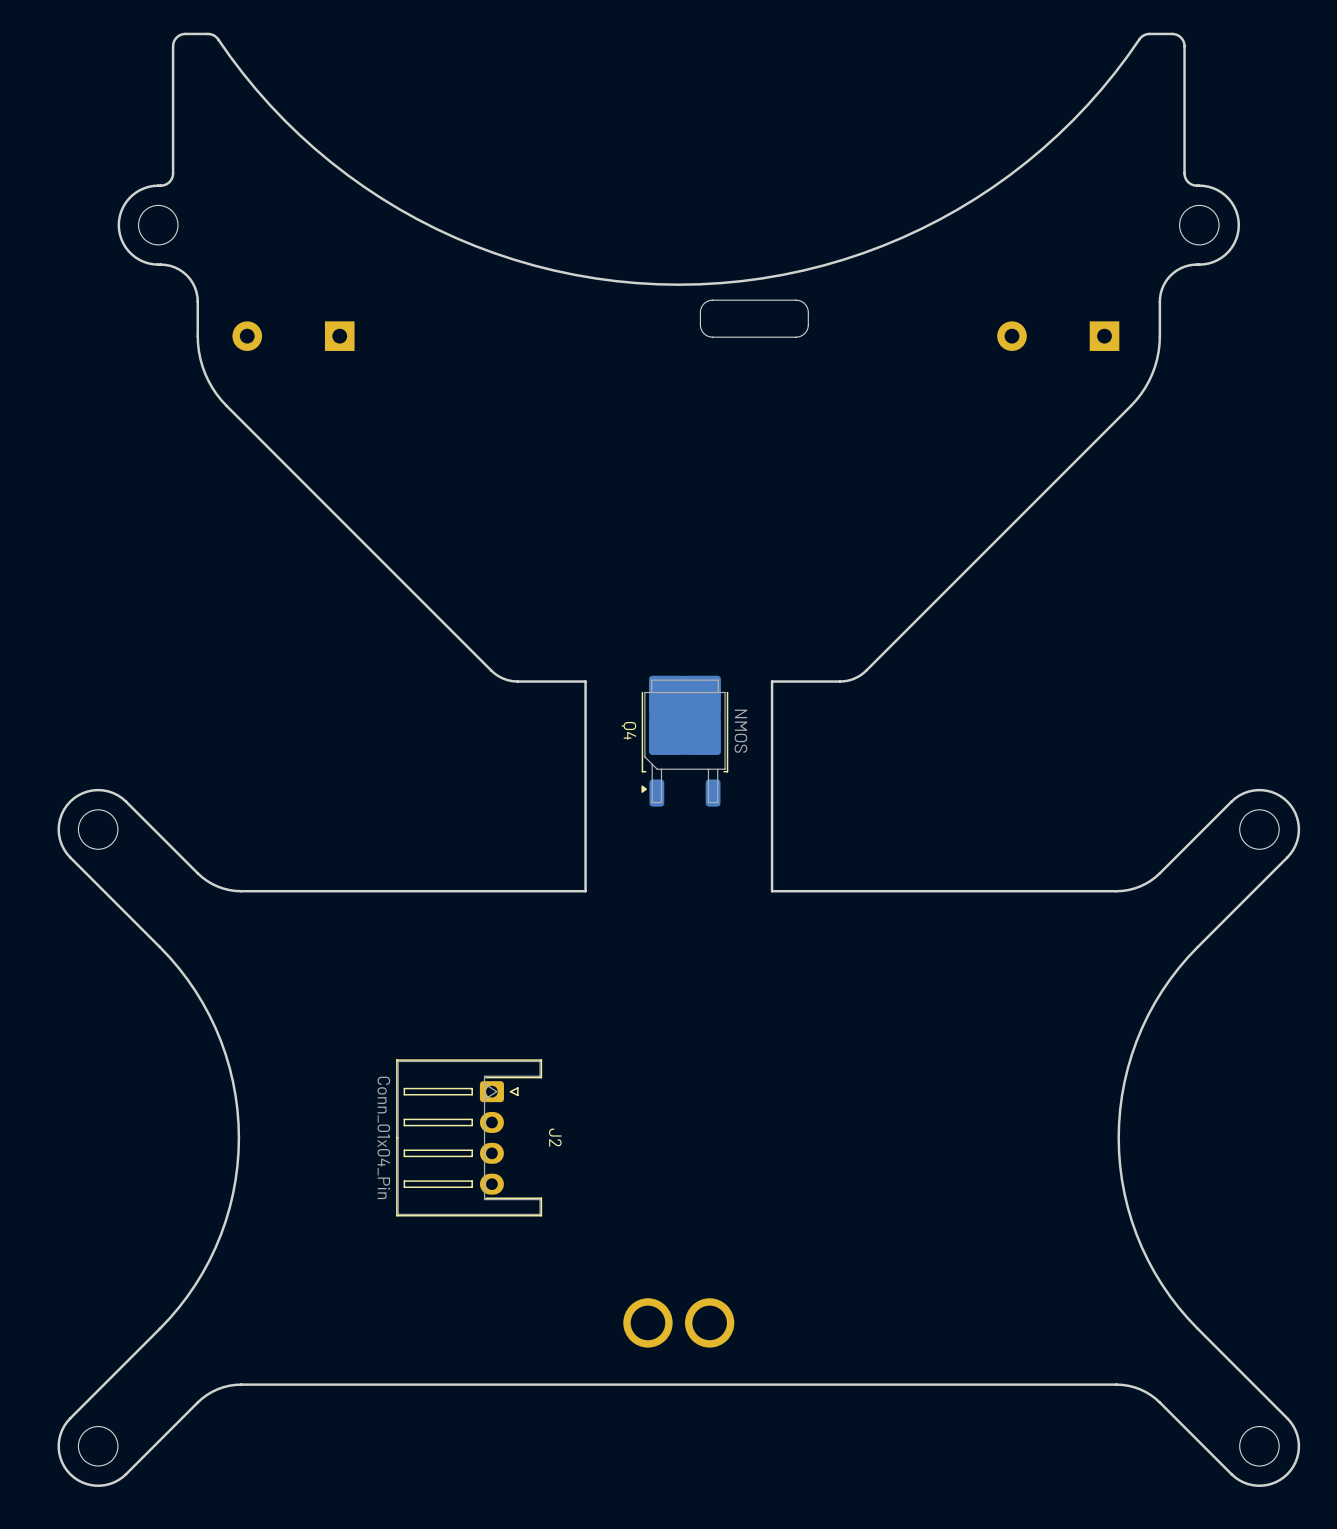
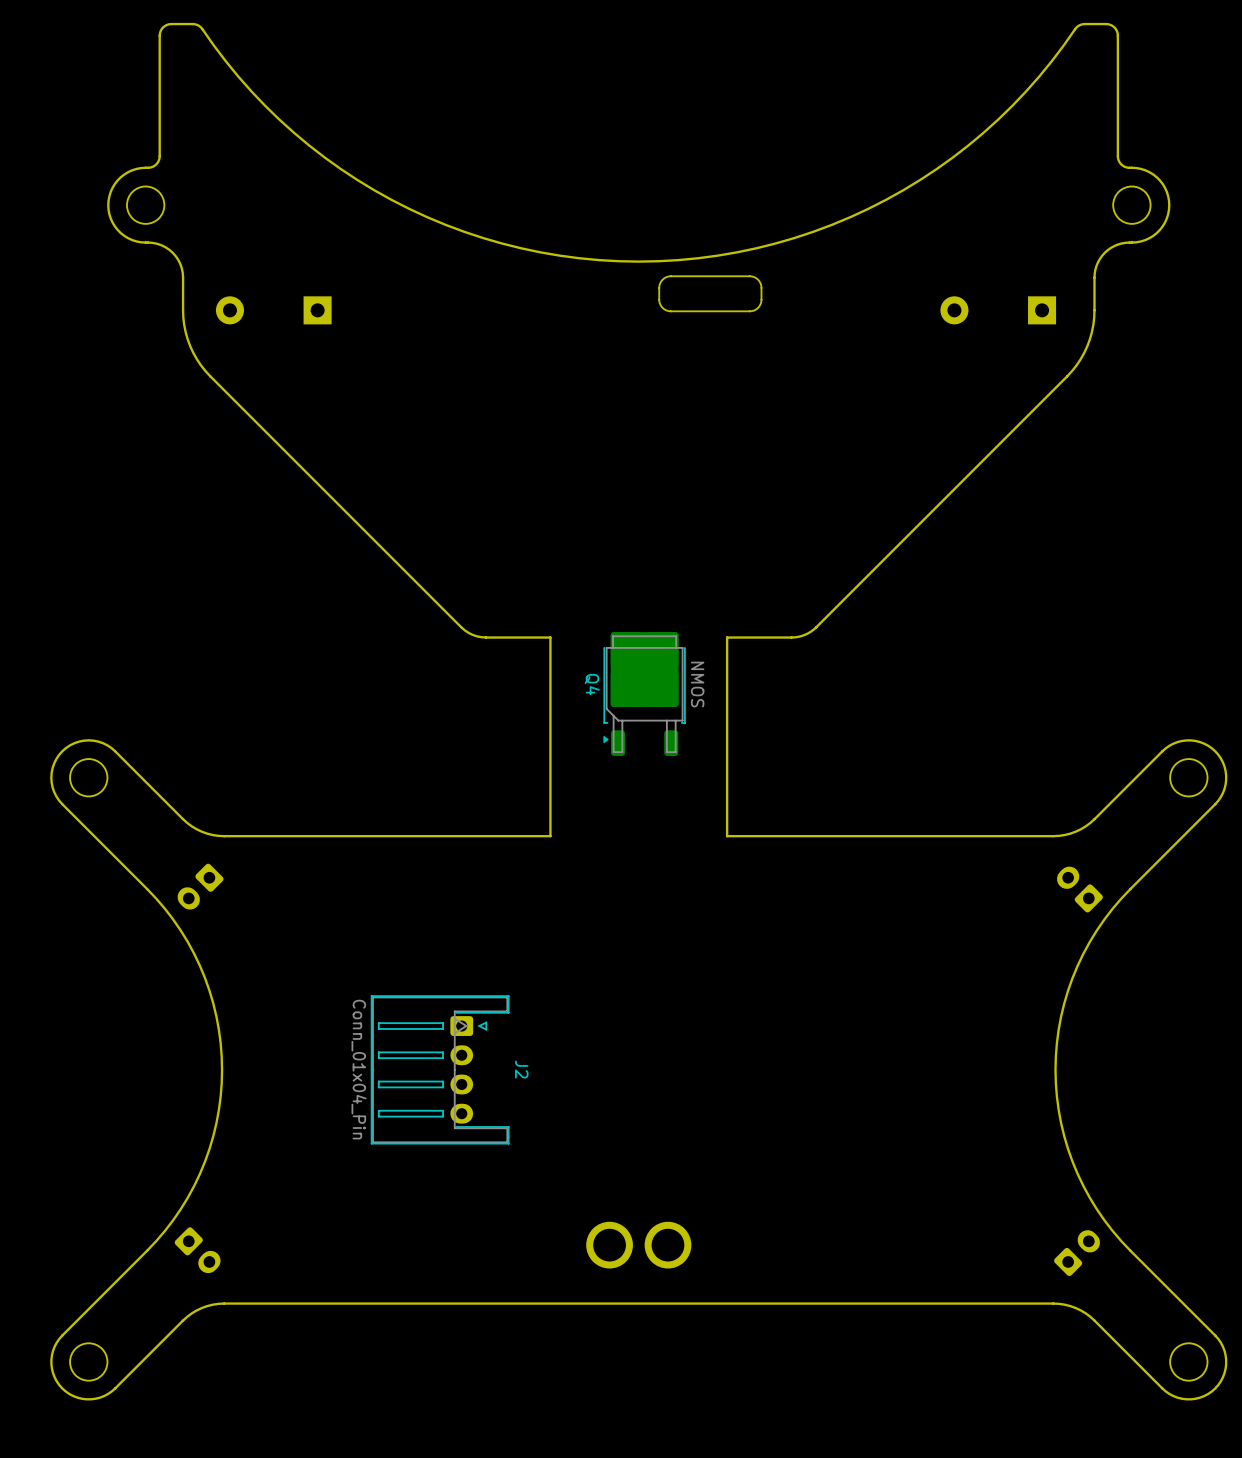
part: none -> (200, 886)
part: none -> (1079, 889)
part: none -> (197, 1250)
part: none -> (1077, 1253)

